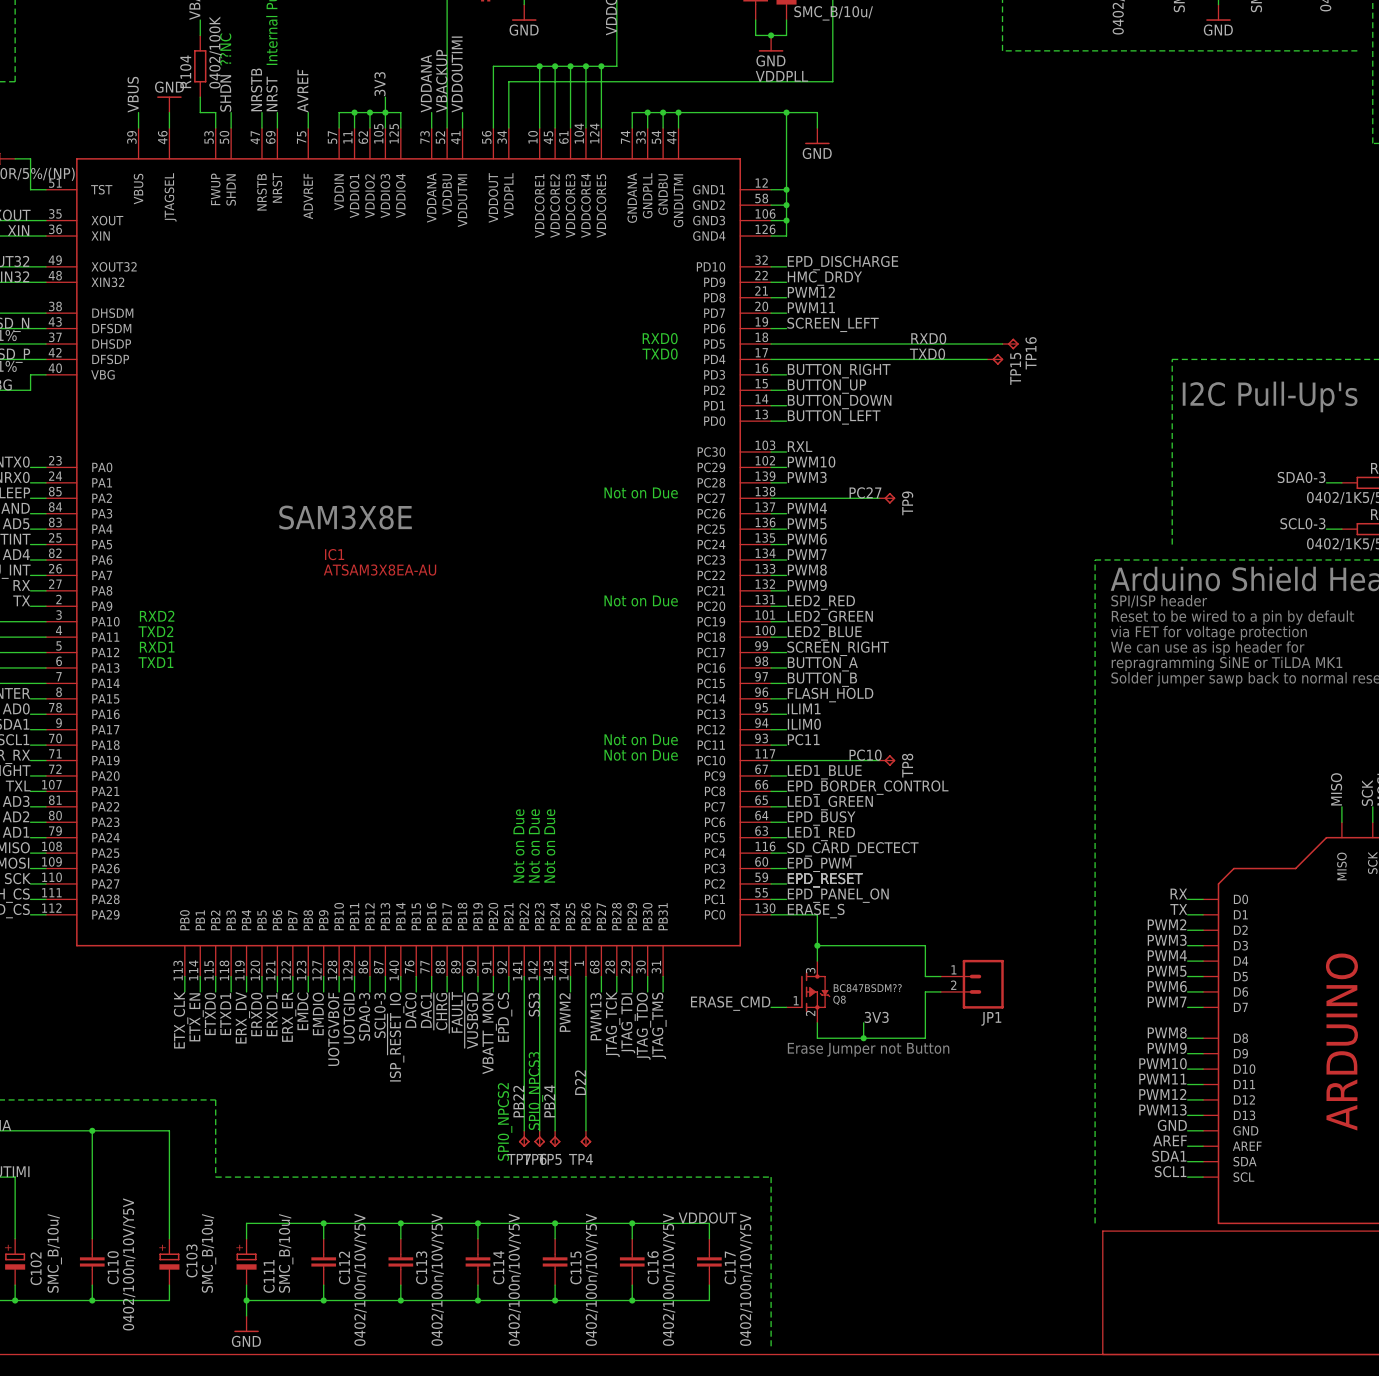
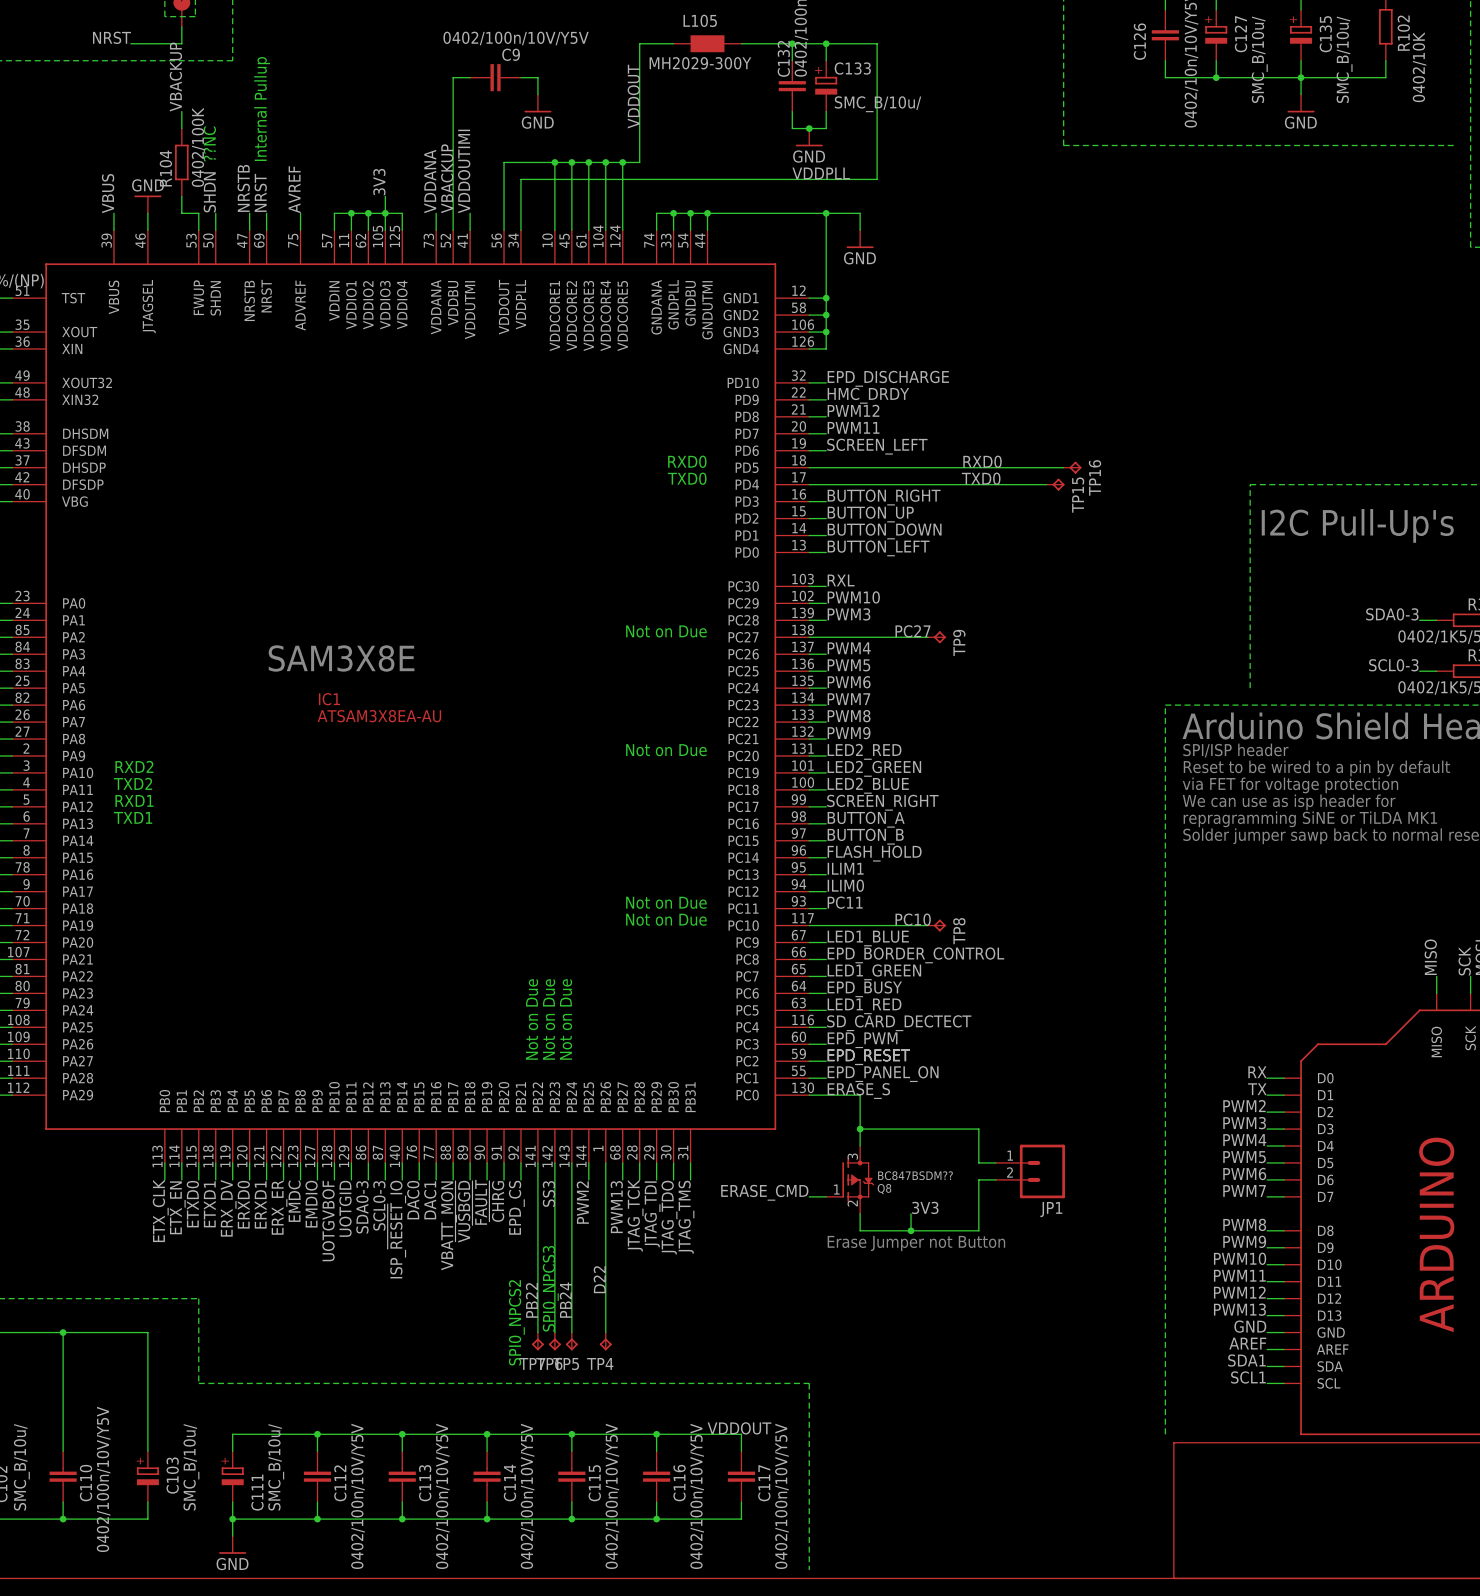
label: ~{CHRG} (440, 1011) -> VBATT_MON (449, 1225)
label: ~{FAULT} (456, 1012) -> ~{VUSBGD} (462, 1211)
label: ~{VUSBGD} (471, 1020) -> ~{FAULT} (479, 1202)
label: VBATT_MON (489, 1033) -> ~{CHRG} (496, 1201)

